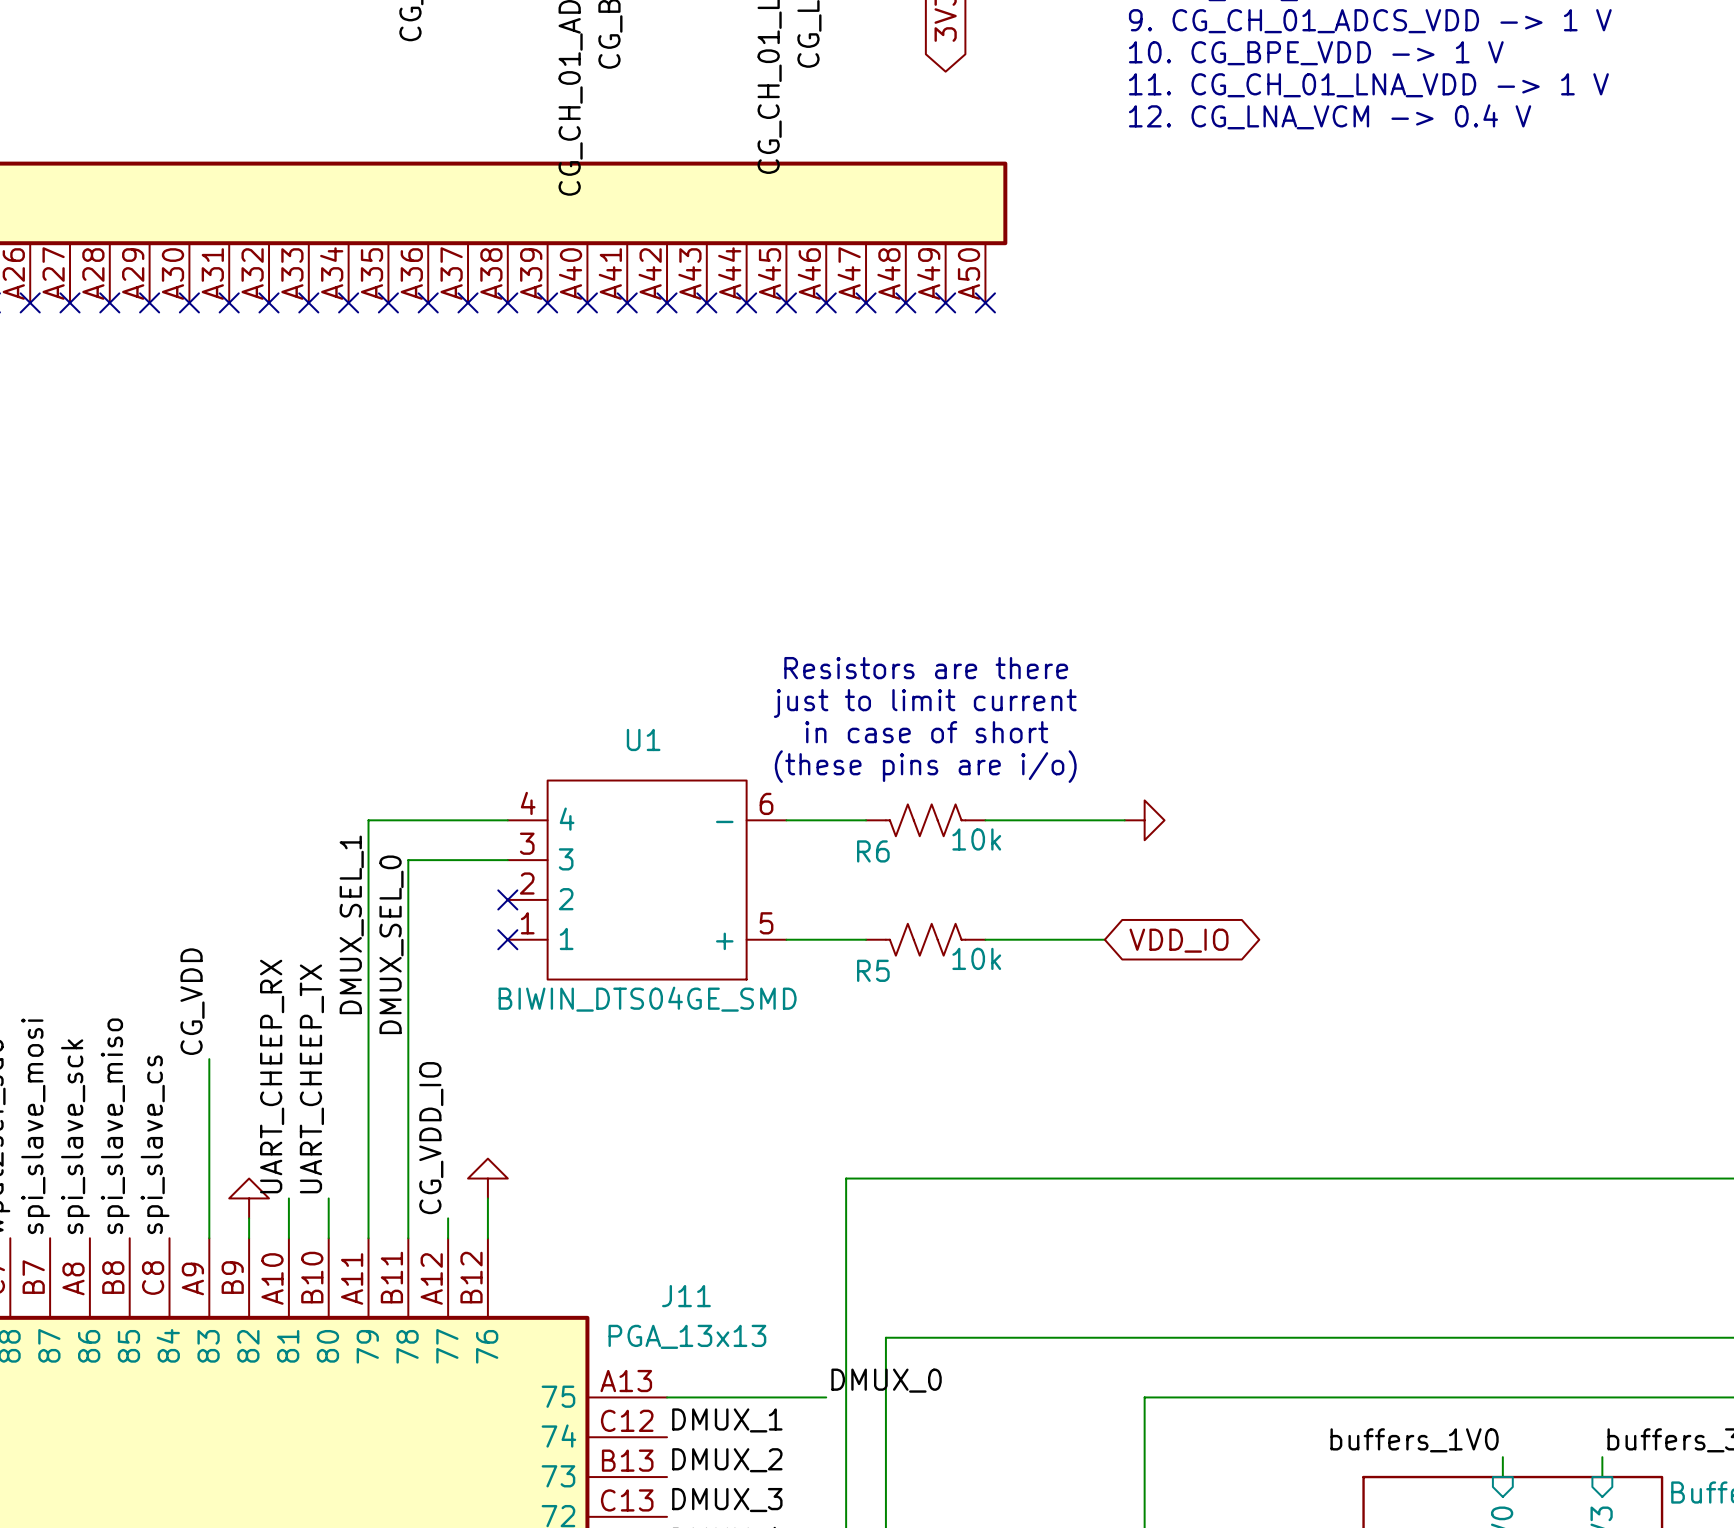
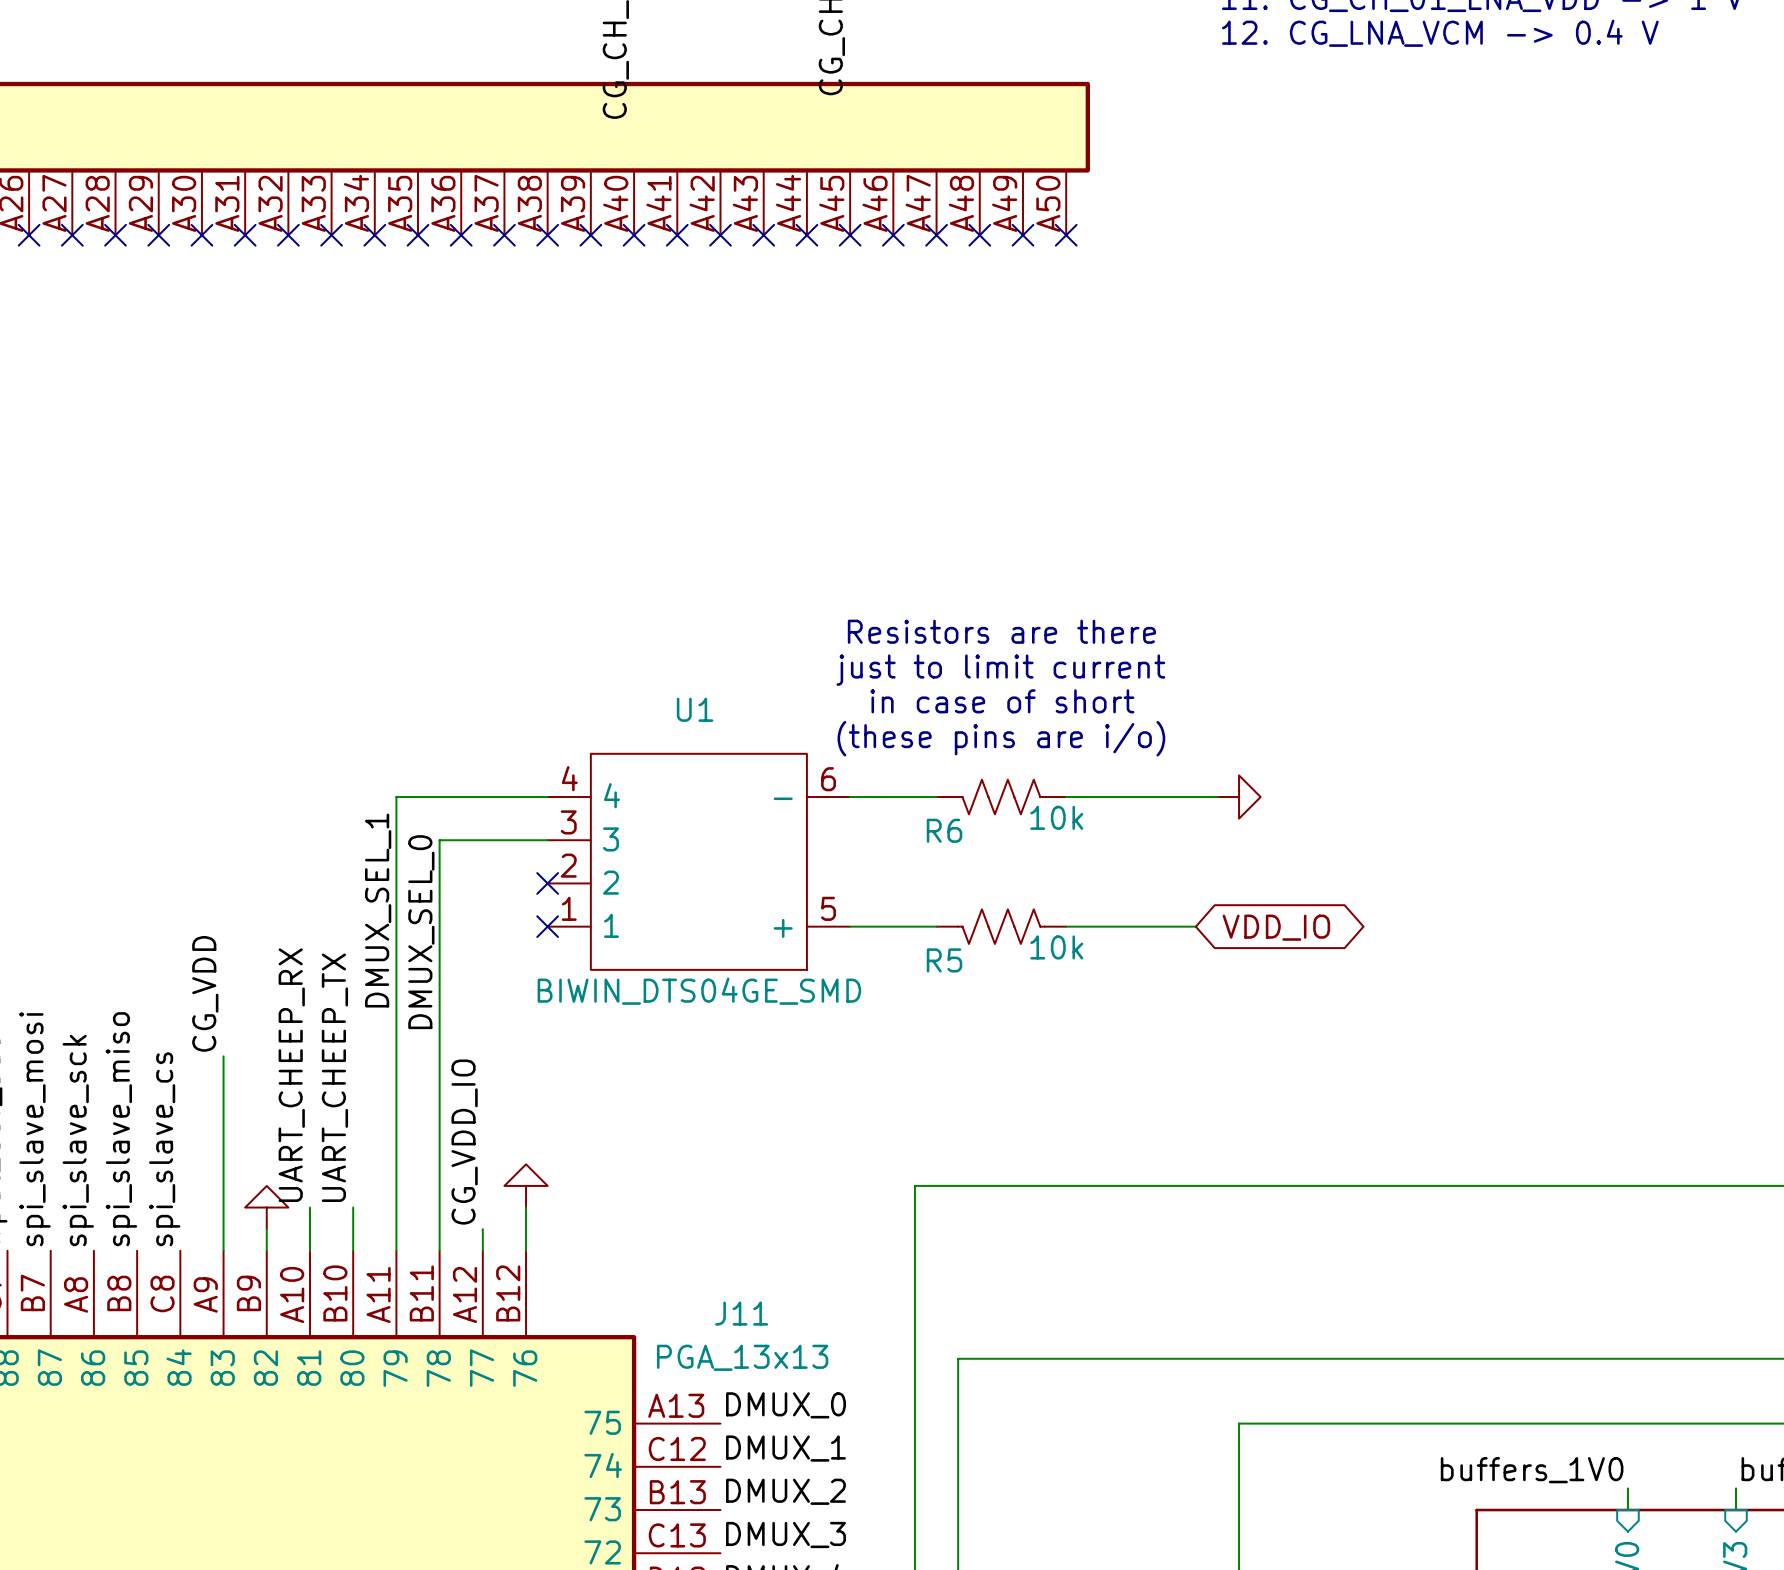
label position: DMUX_0 (886, 1380) -> DMUX_0 (785, 1405)
wire: (667, 1397) (826, 1397) -> none

